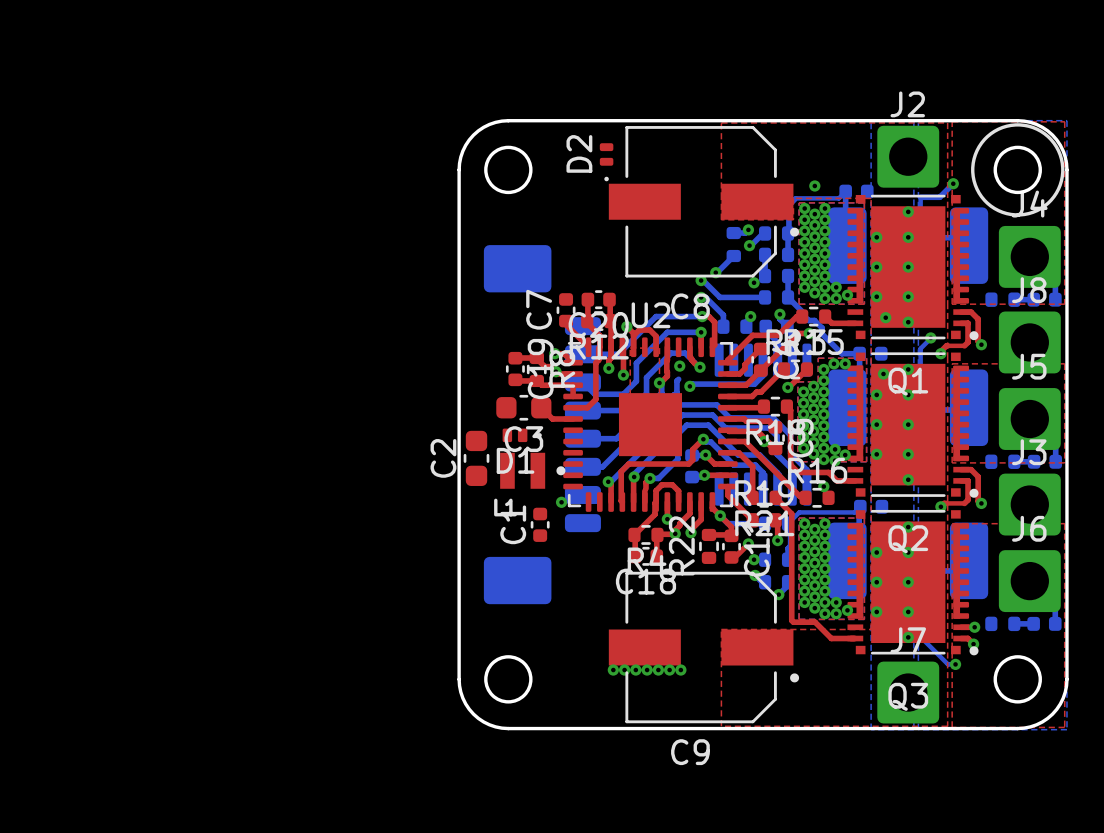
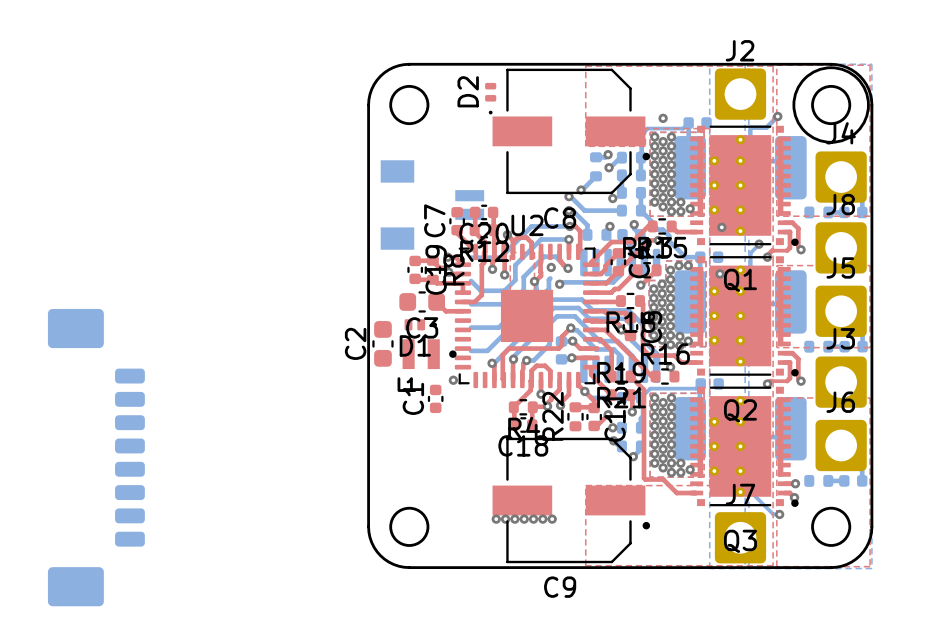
part: none -> (432, 205)
part position: (542, 424) -> (96, 457)

